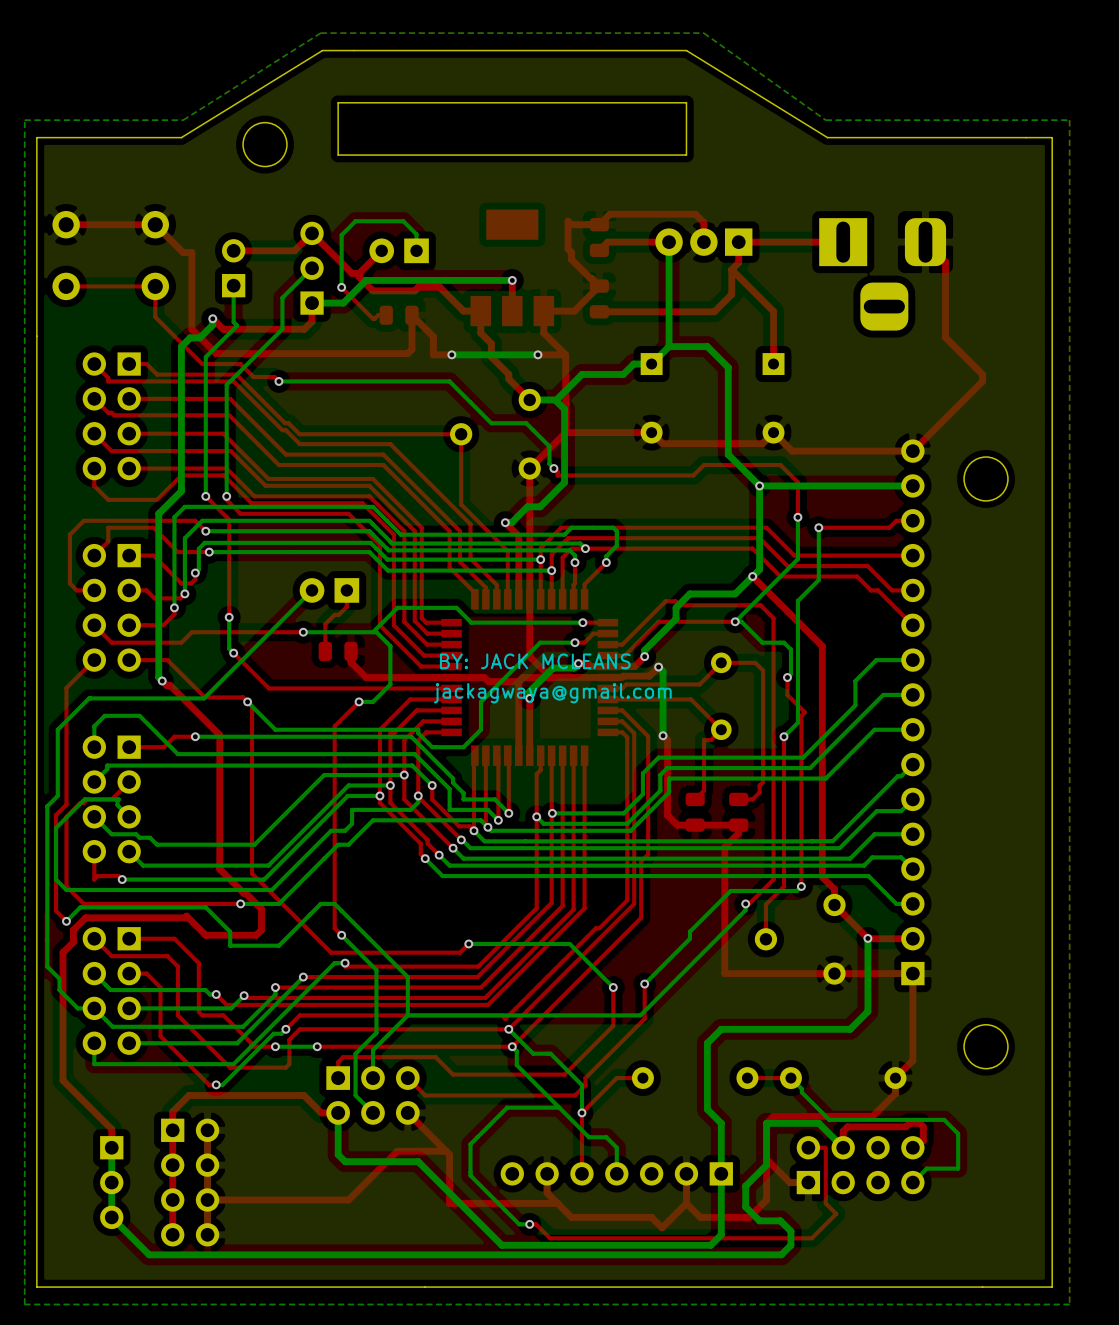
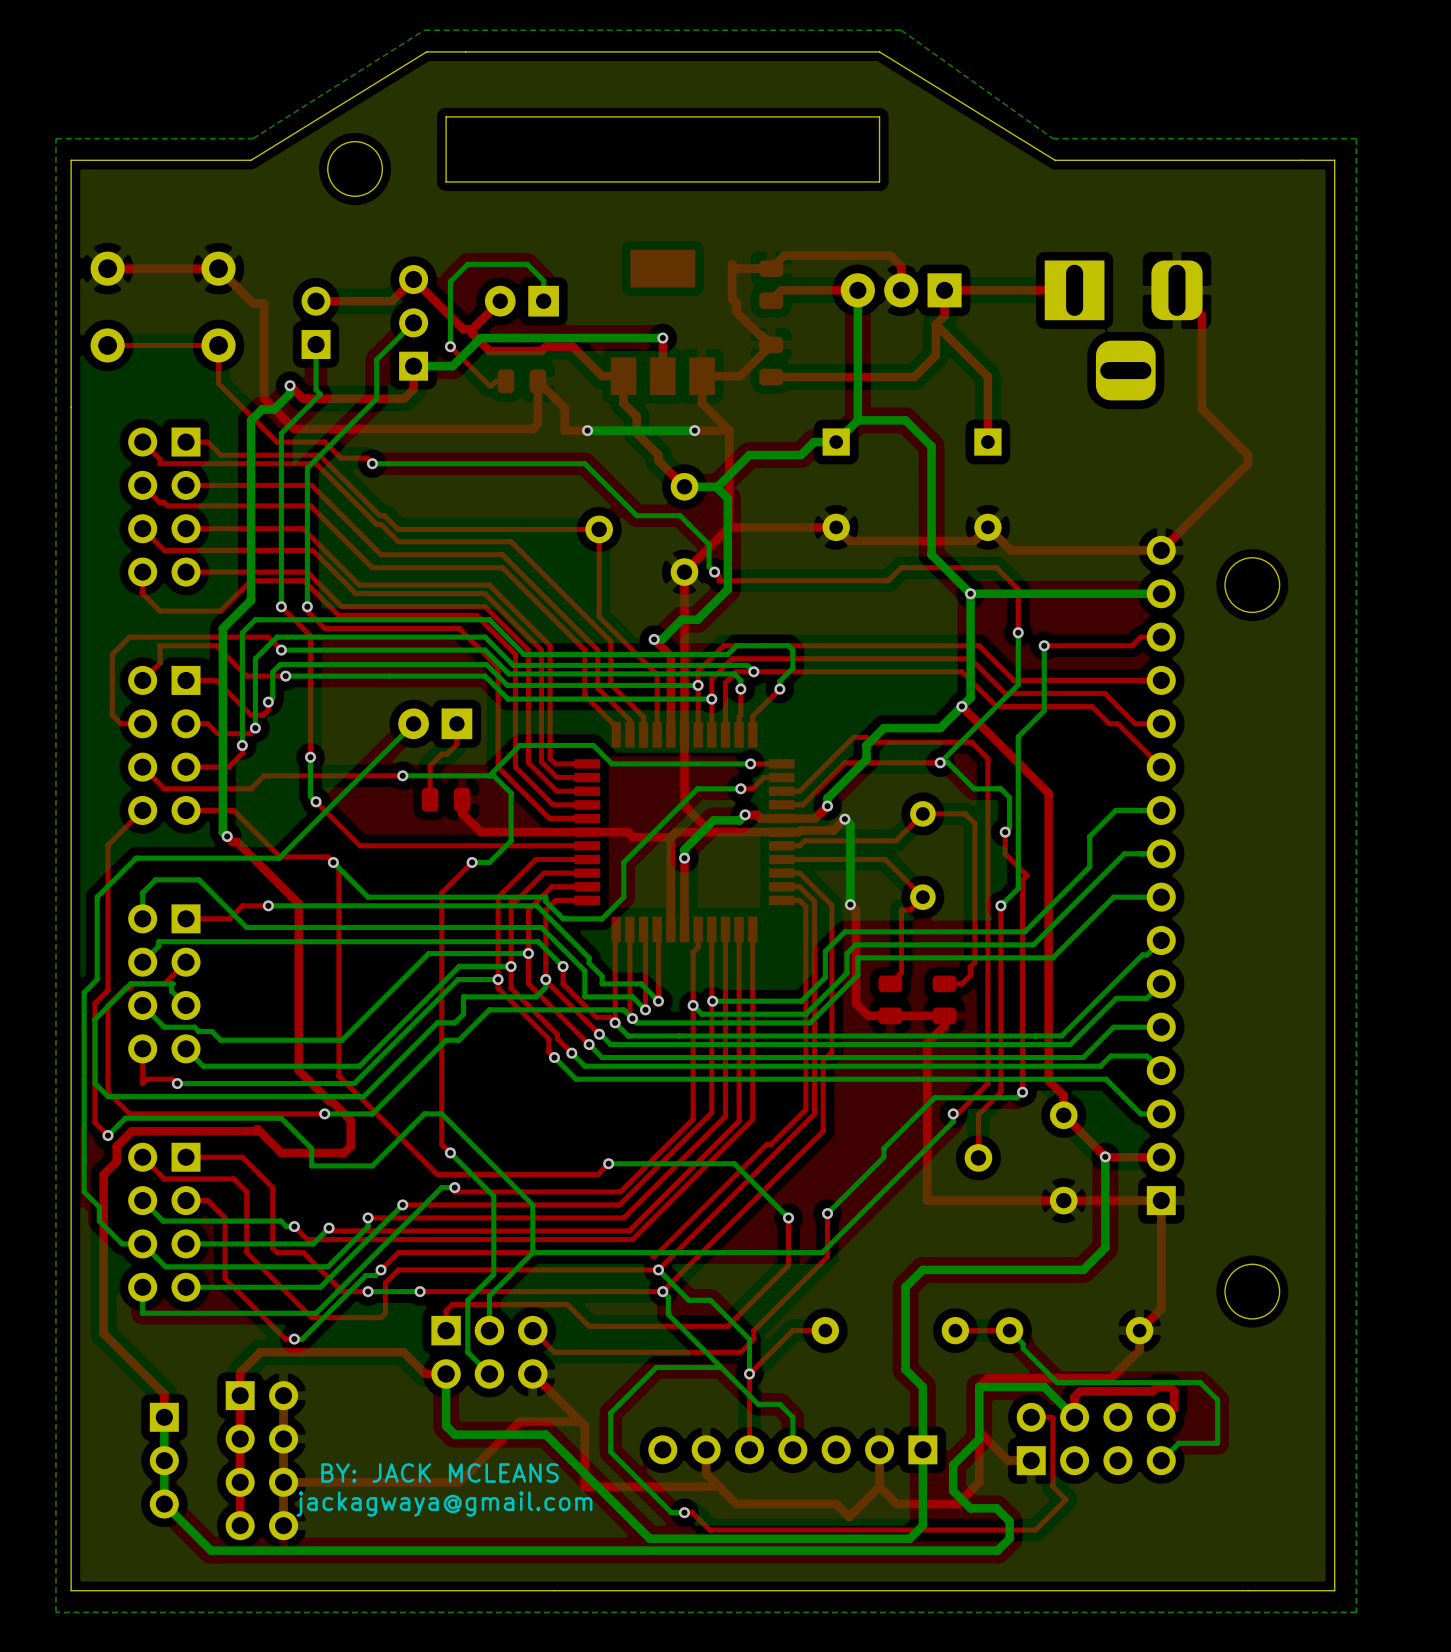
text: BY: JACK MCLEANS (535, 661) -> none
text: jackagwaya@gmail.com (552, 693) -> none
text: none -> BY: JACK MCLEANS (439, 1473)
text: none -> jackagwaya@gmail.com (444, 1504)

